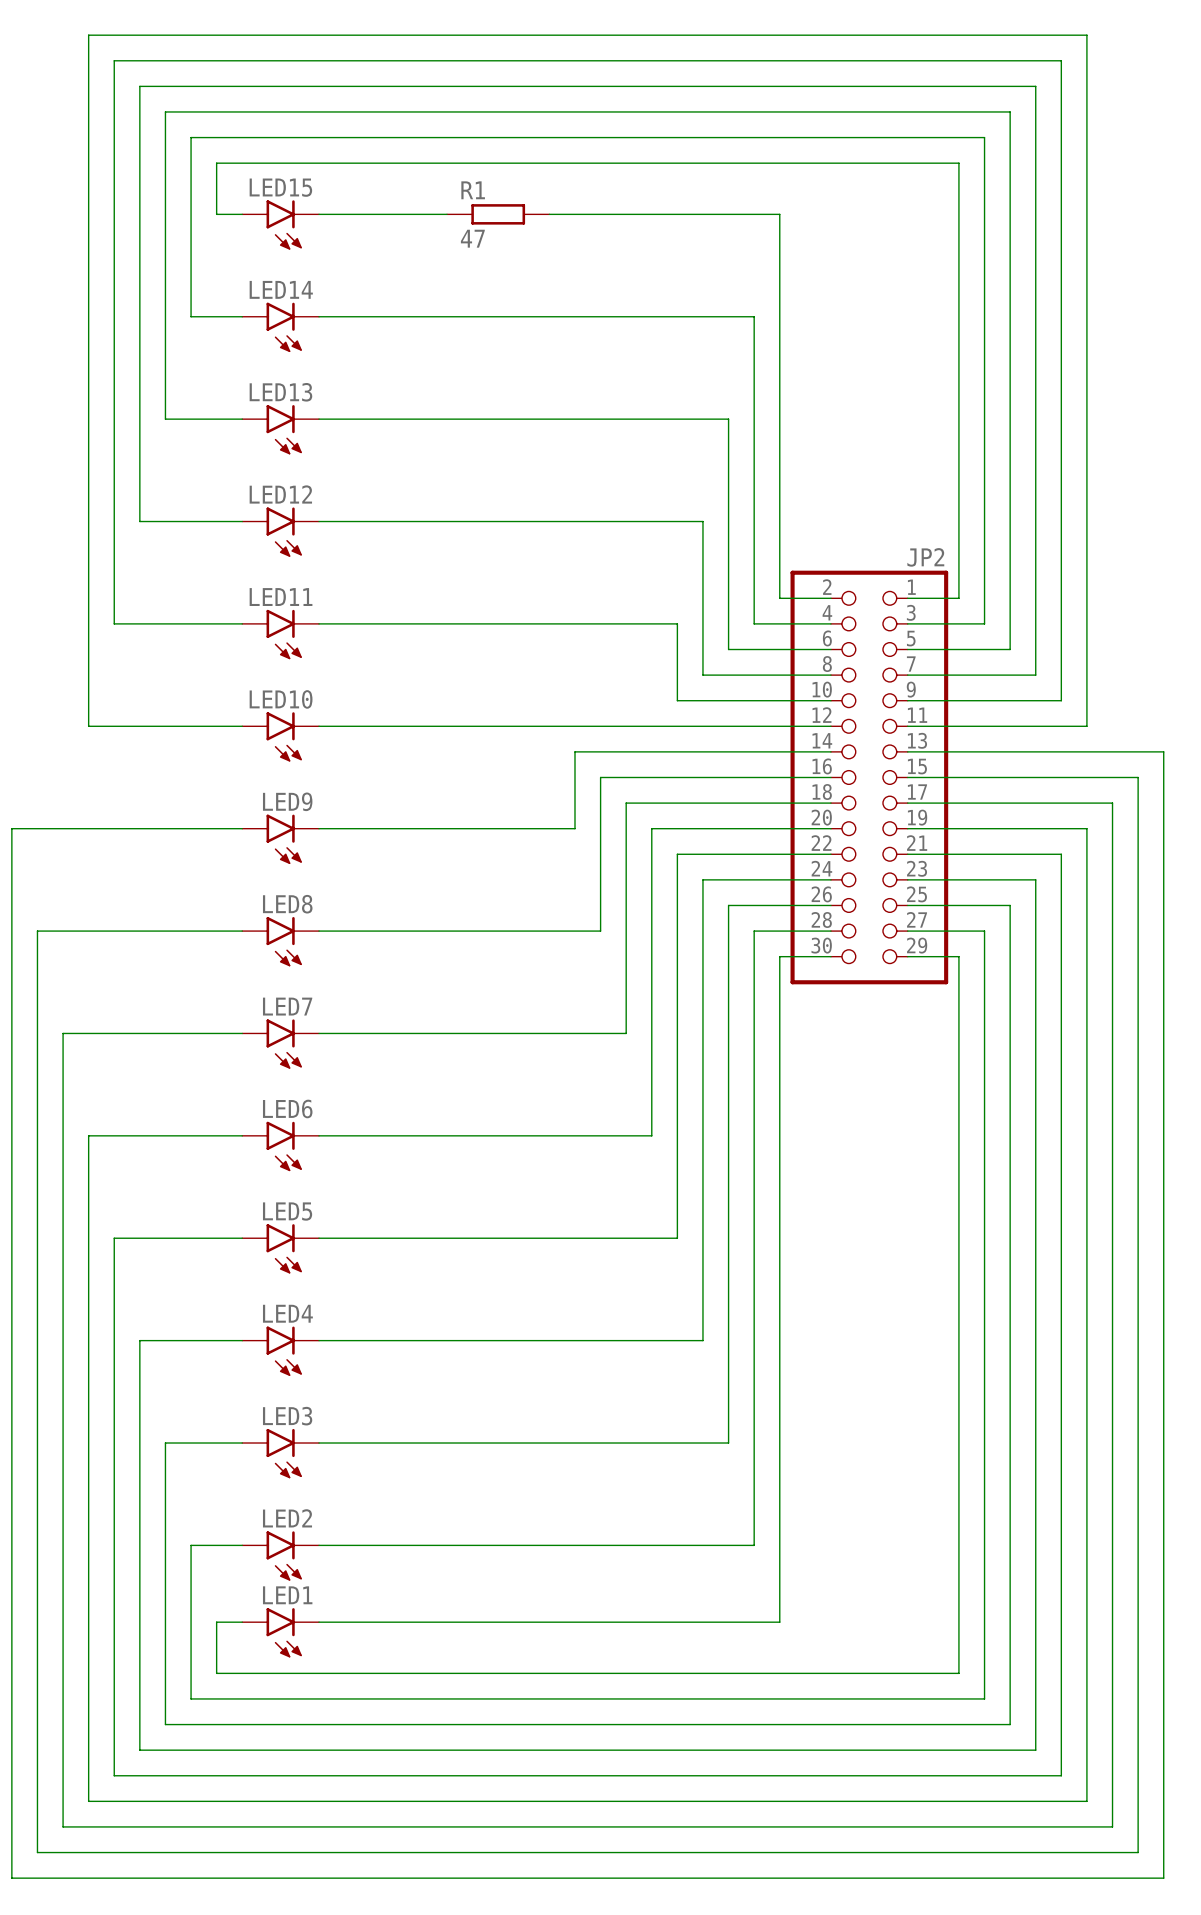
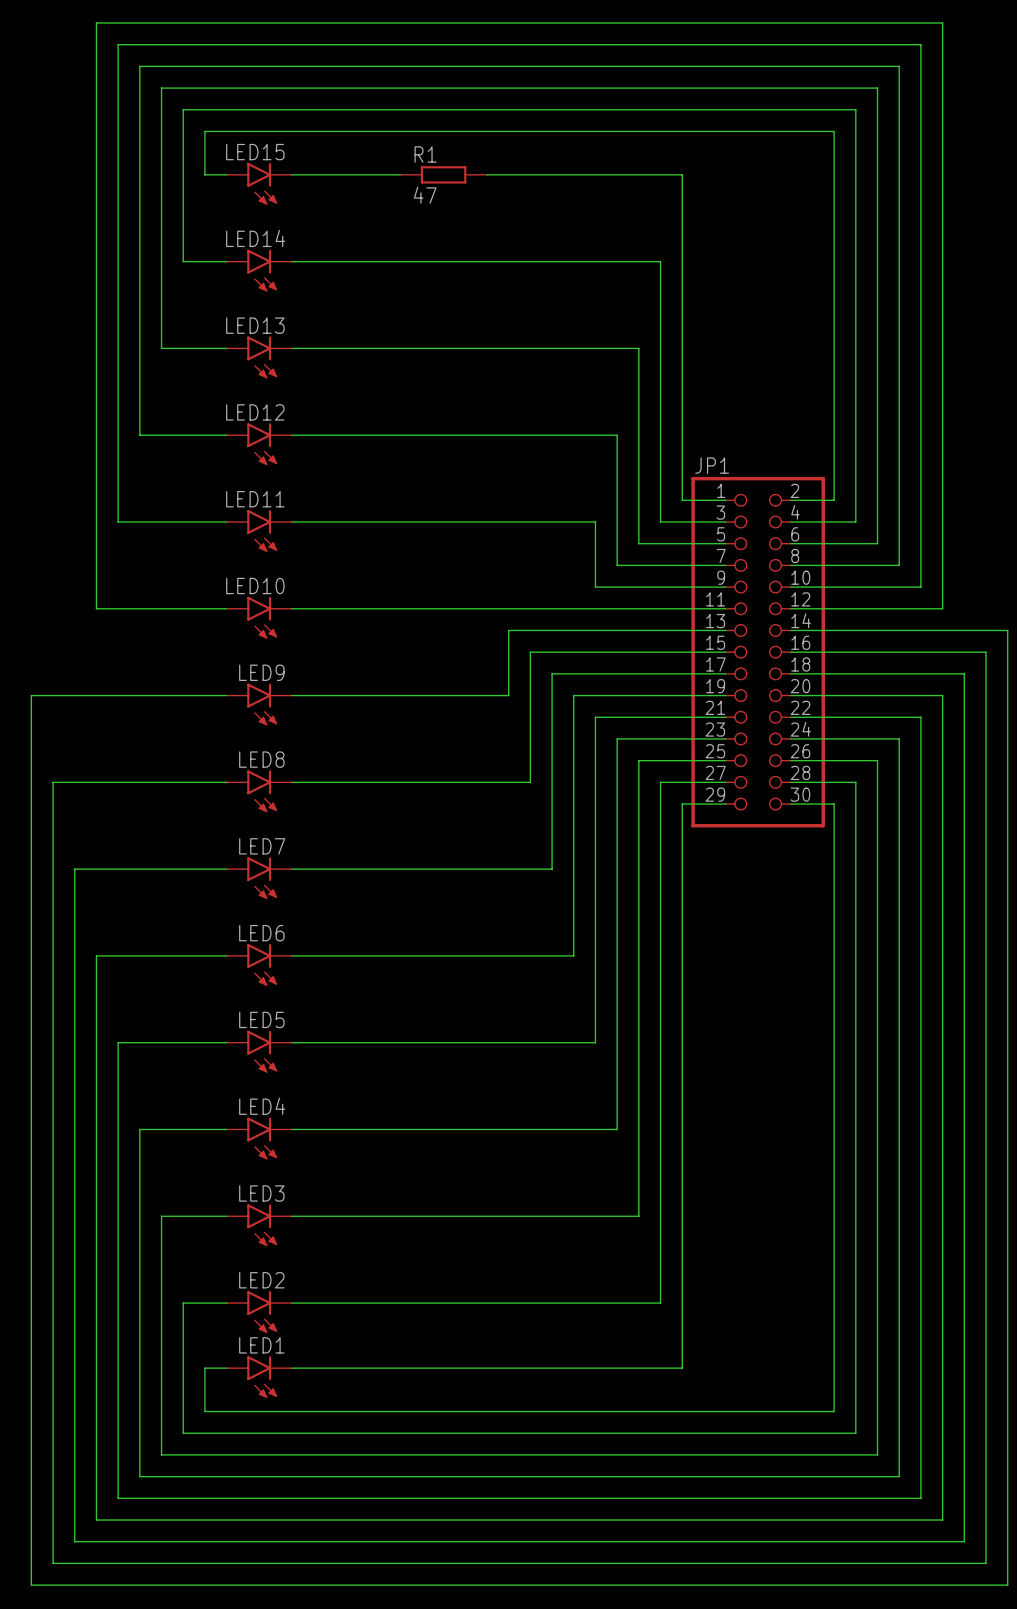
JP2 name: JP2 (925, 557) -> JP1 (712, 465)
JP2 flip: as is (869, 777) -> left-right (758, 652)

